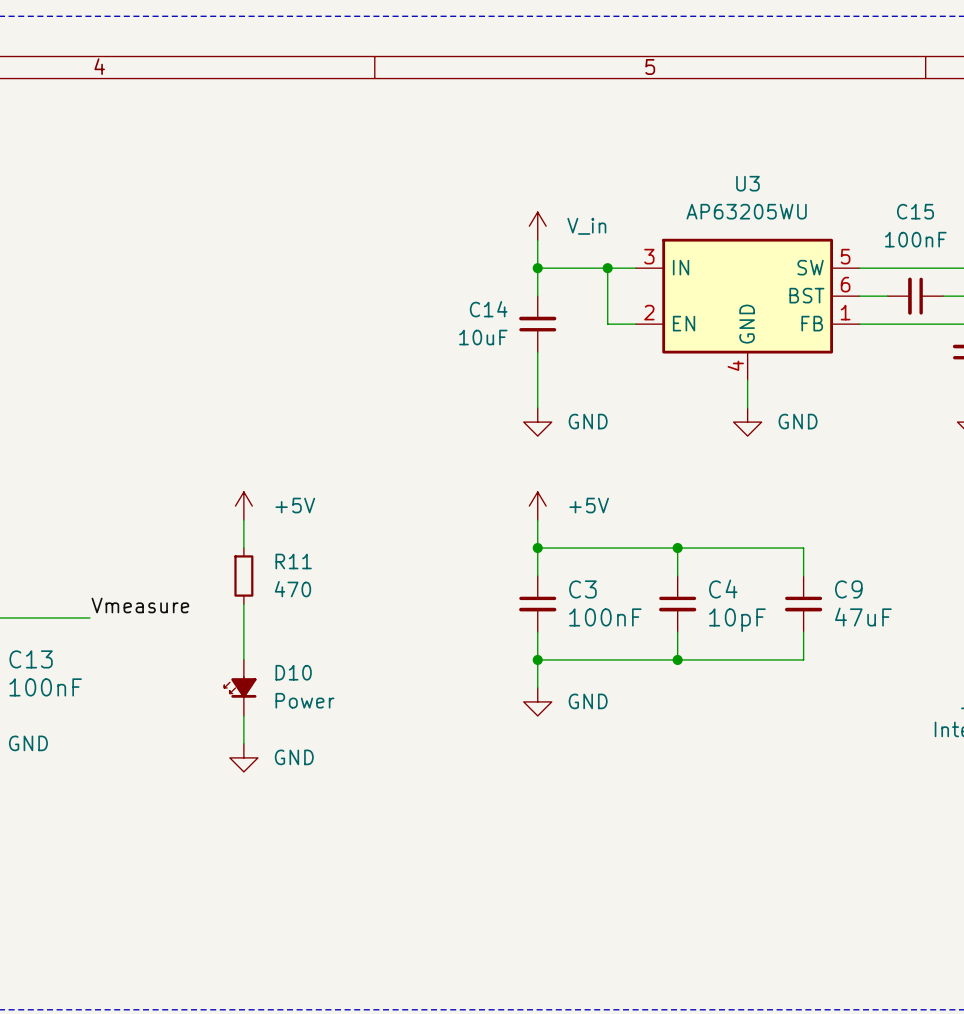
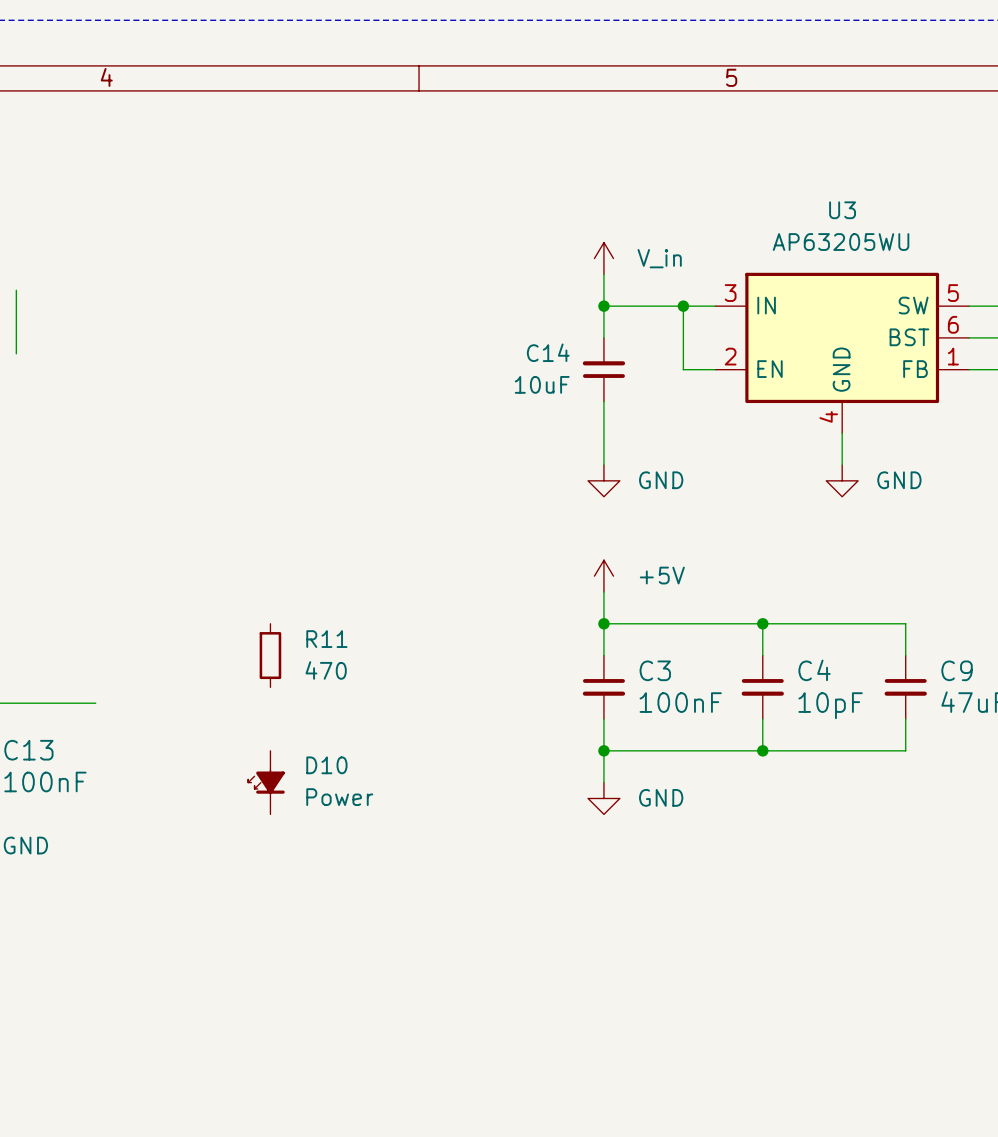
wire: none -> (16, 290) (16, 353)
power symbol: +5V (243, 506) -> none
wire: (243, 520) (243, 548) -> none
wire: (243, 603) (243, 659) -> none
label: Vmeasure (140, 605) -> none
wire: (243, 715) (243, 743) -> none
power symbol: GND (243, 757) -> none

